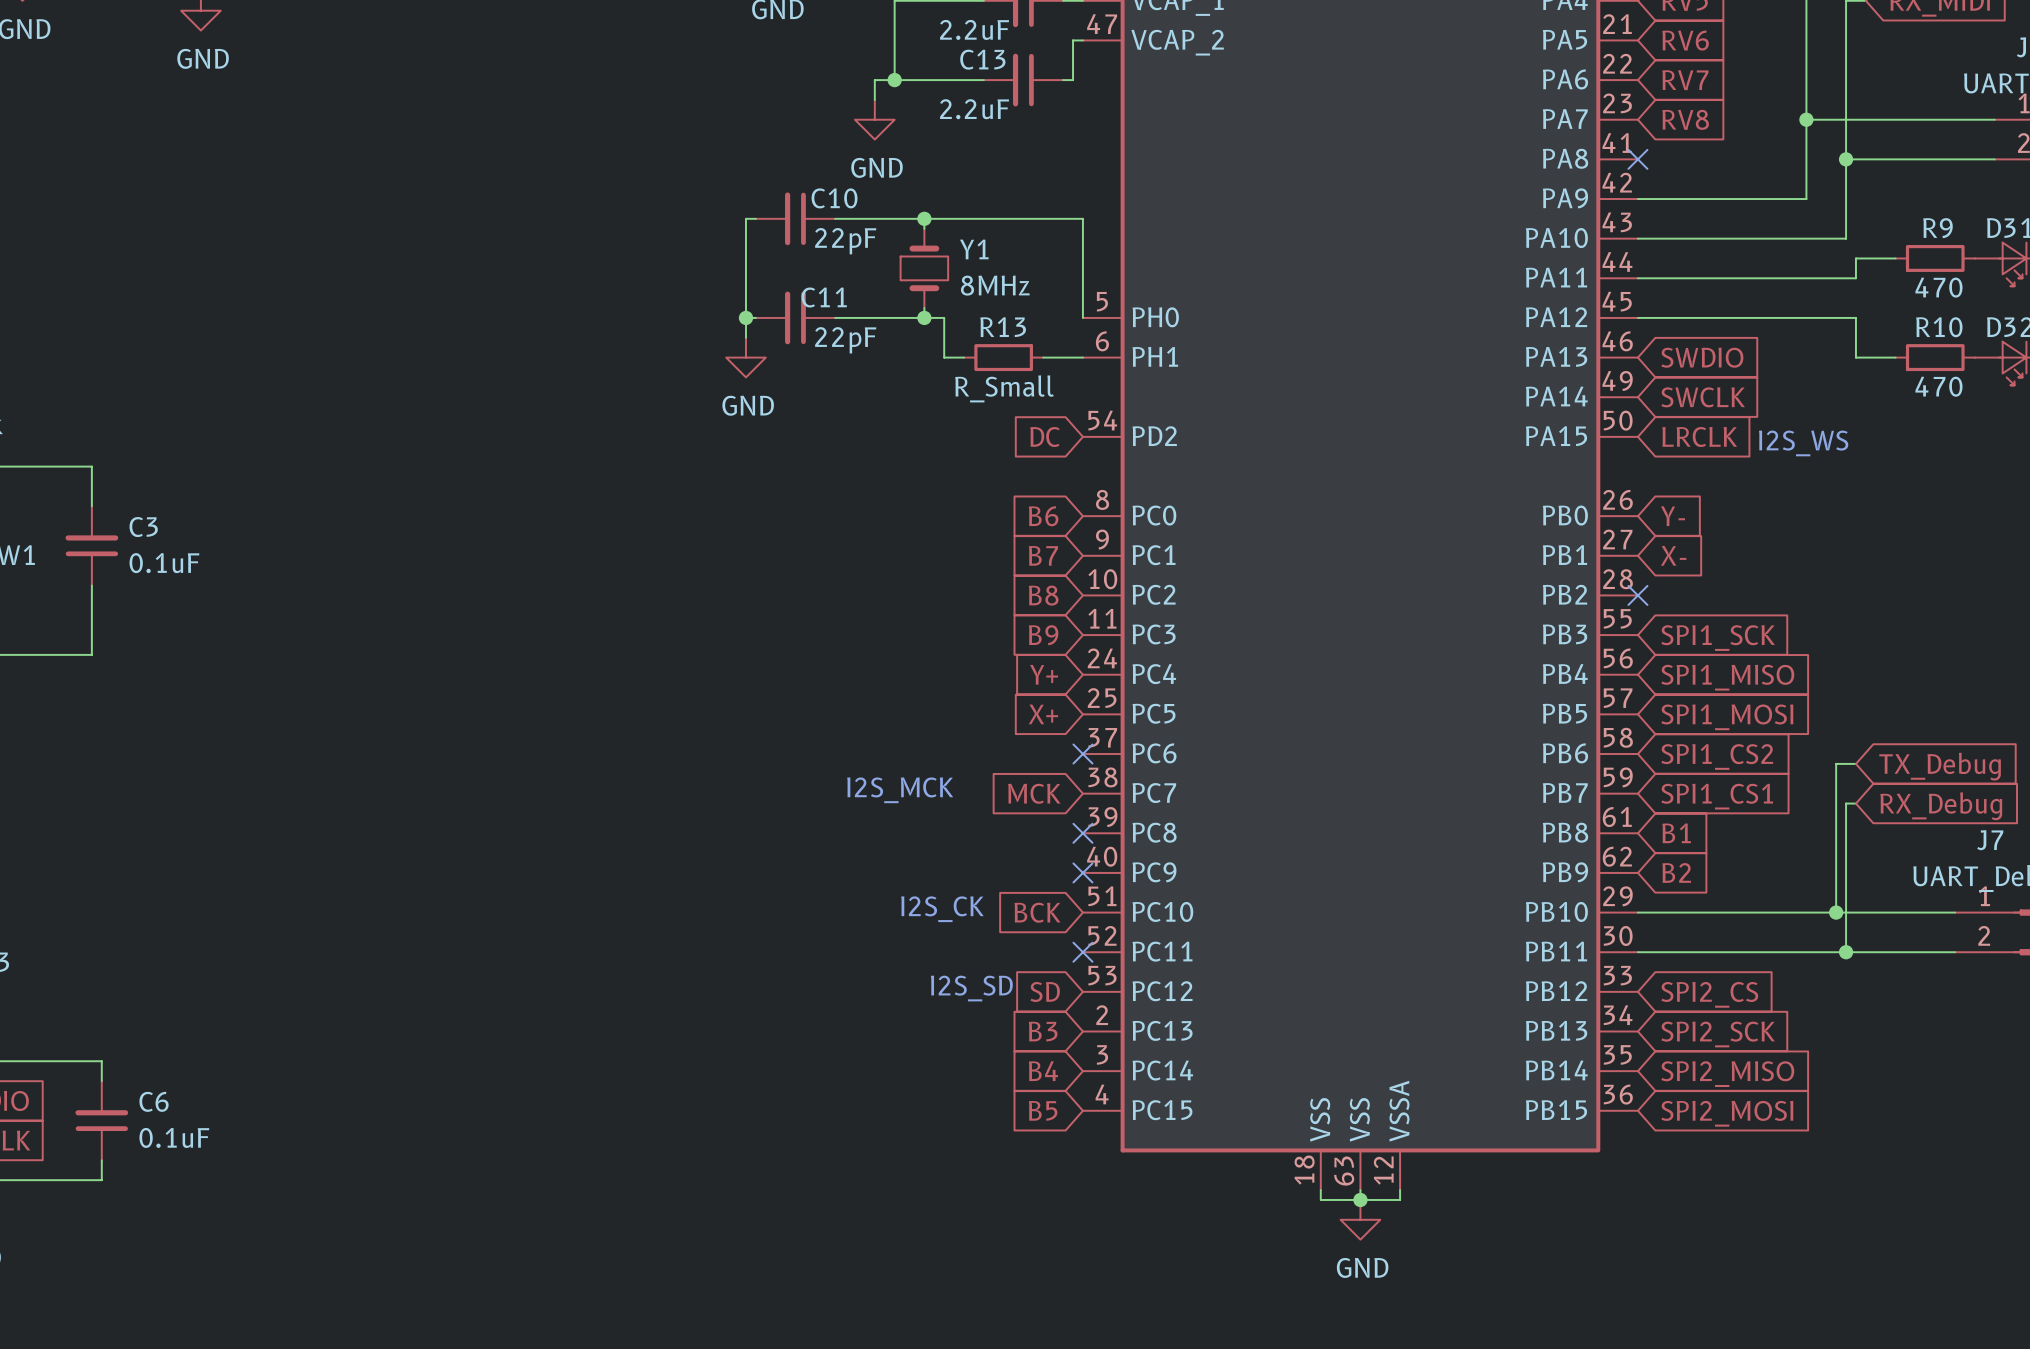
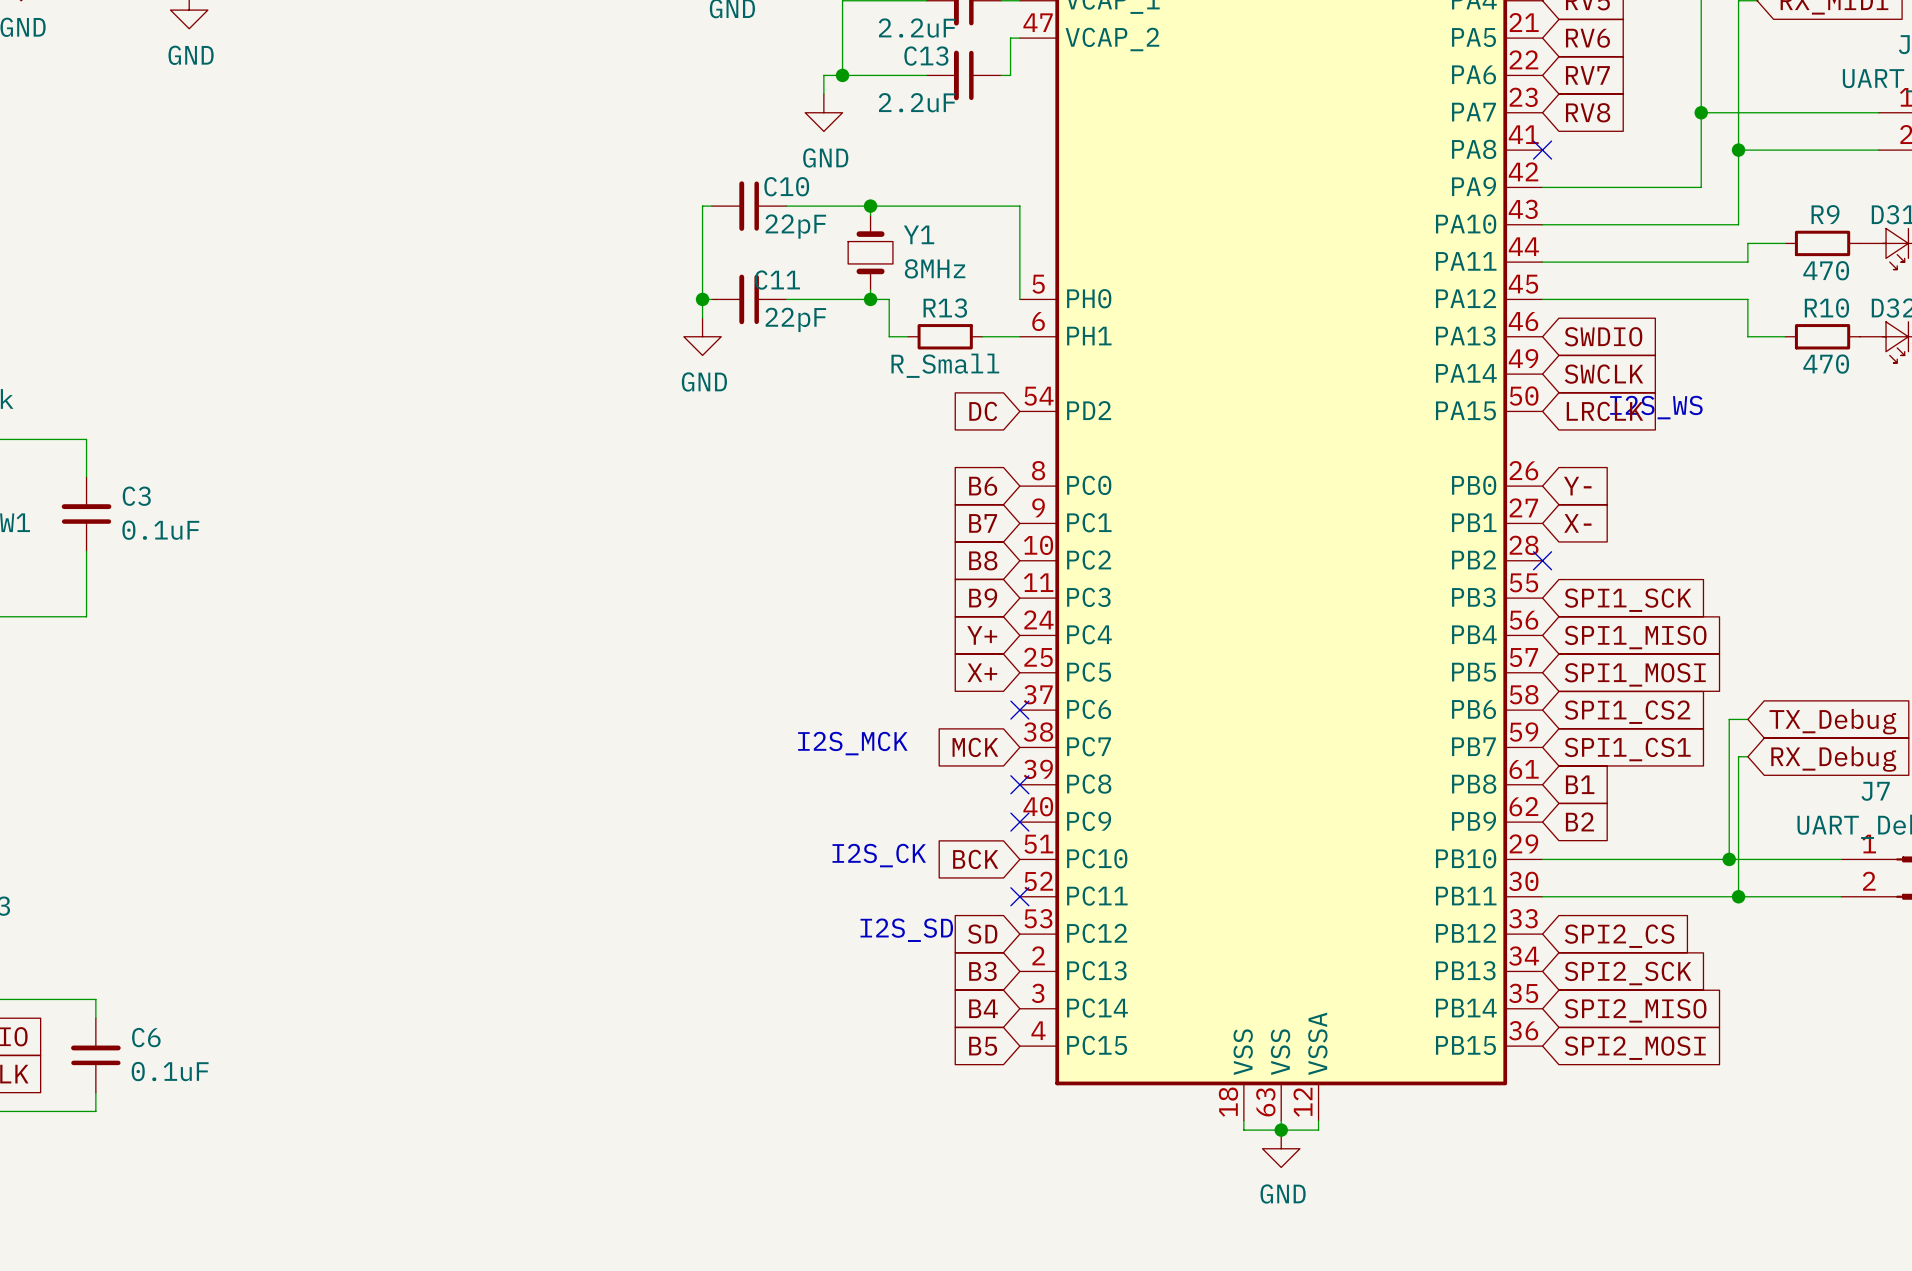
text position: I2S_WS (1803, 443) -> I2S_WS (1656, 407)

